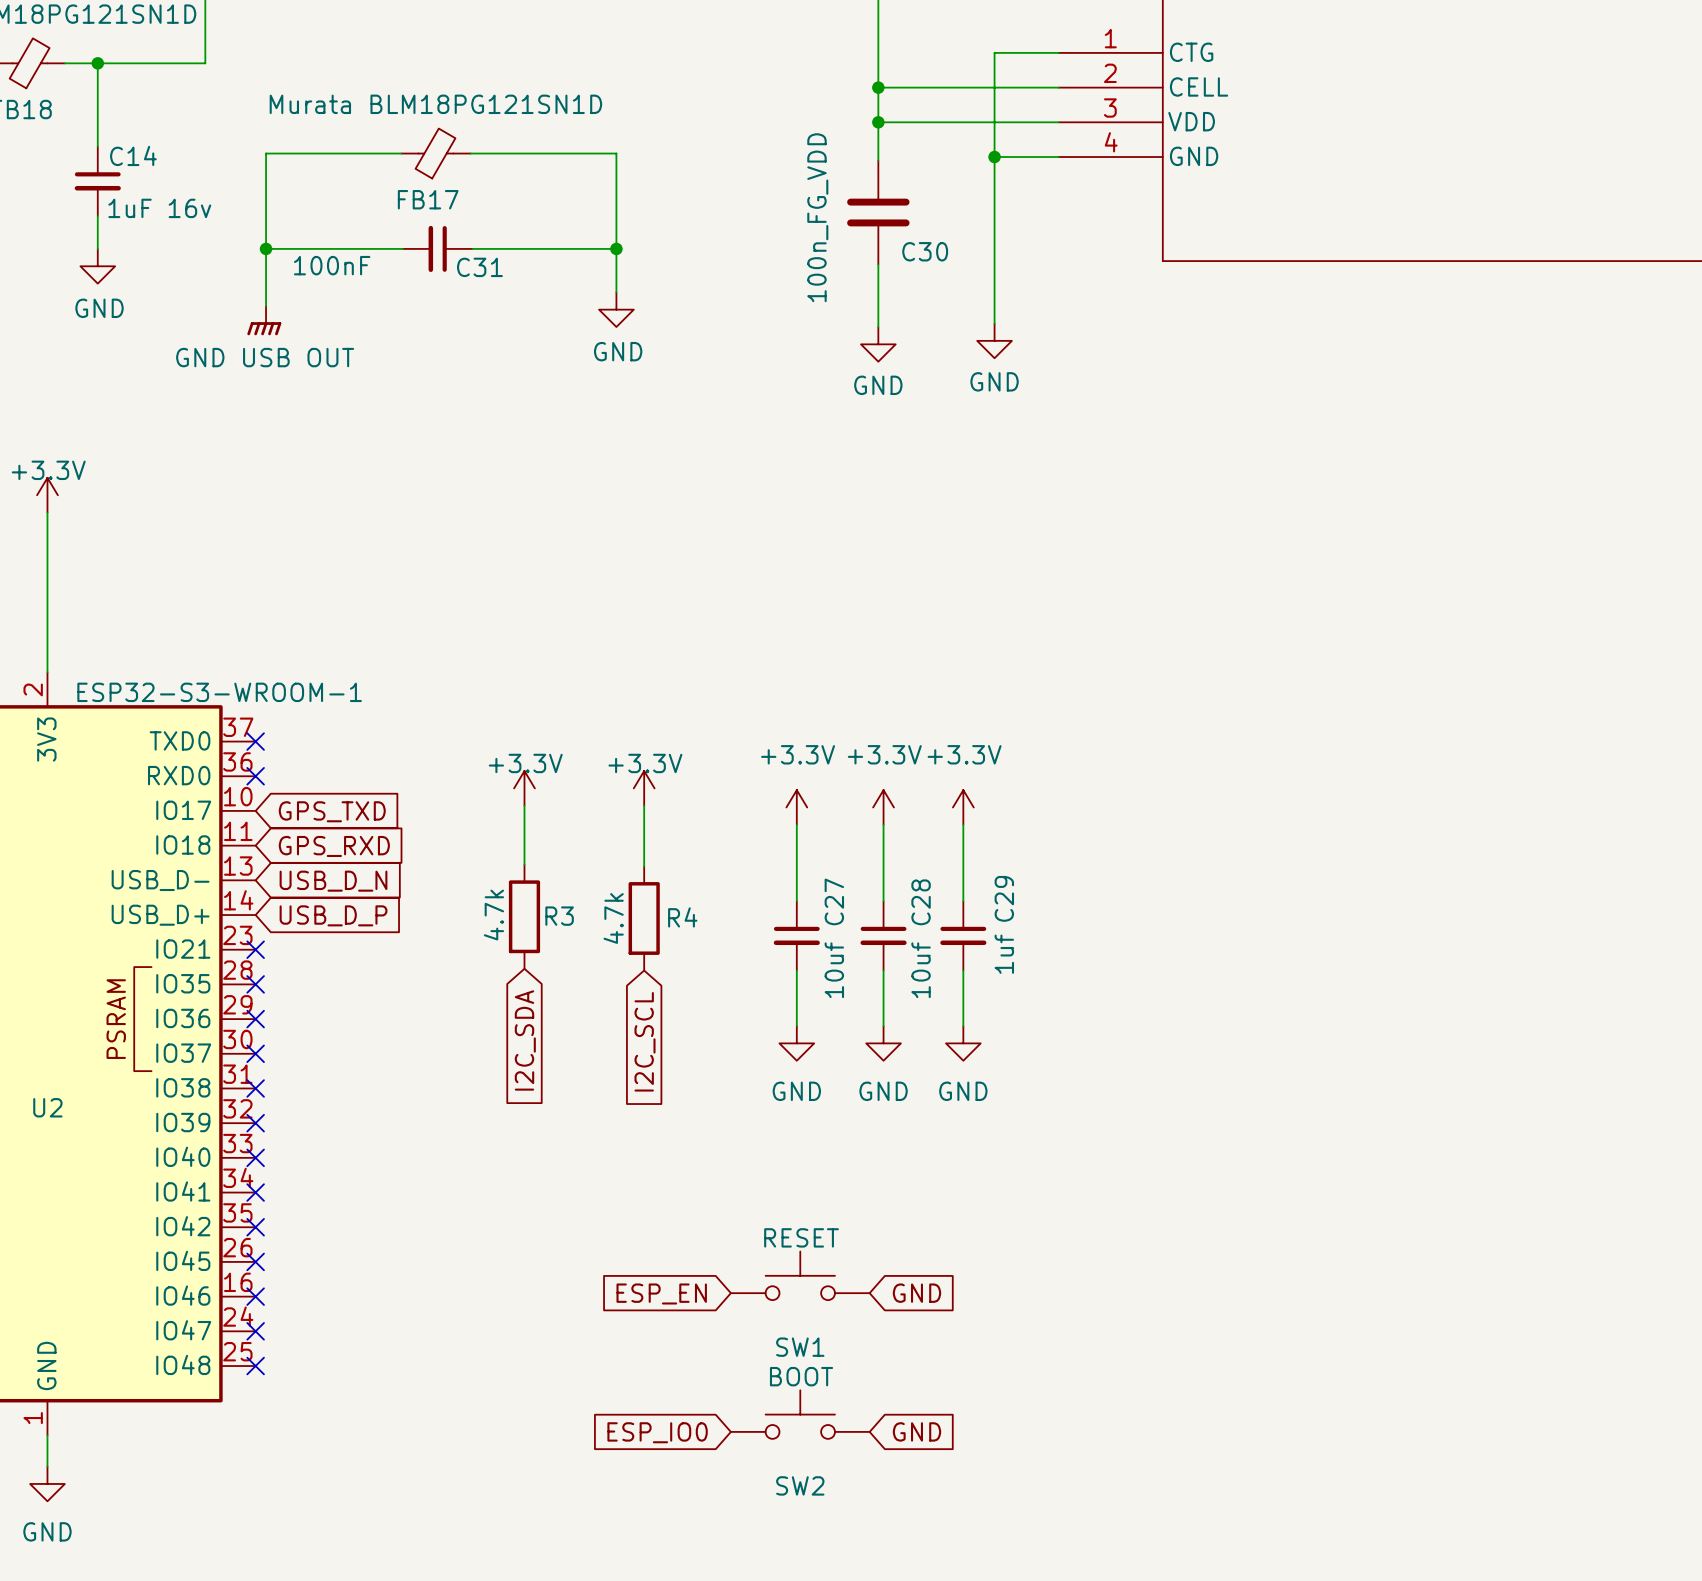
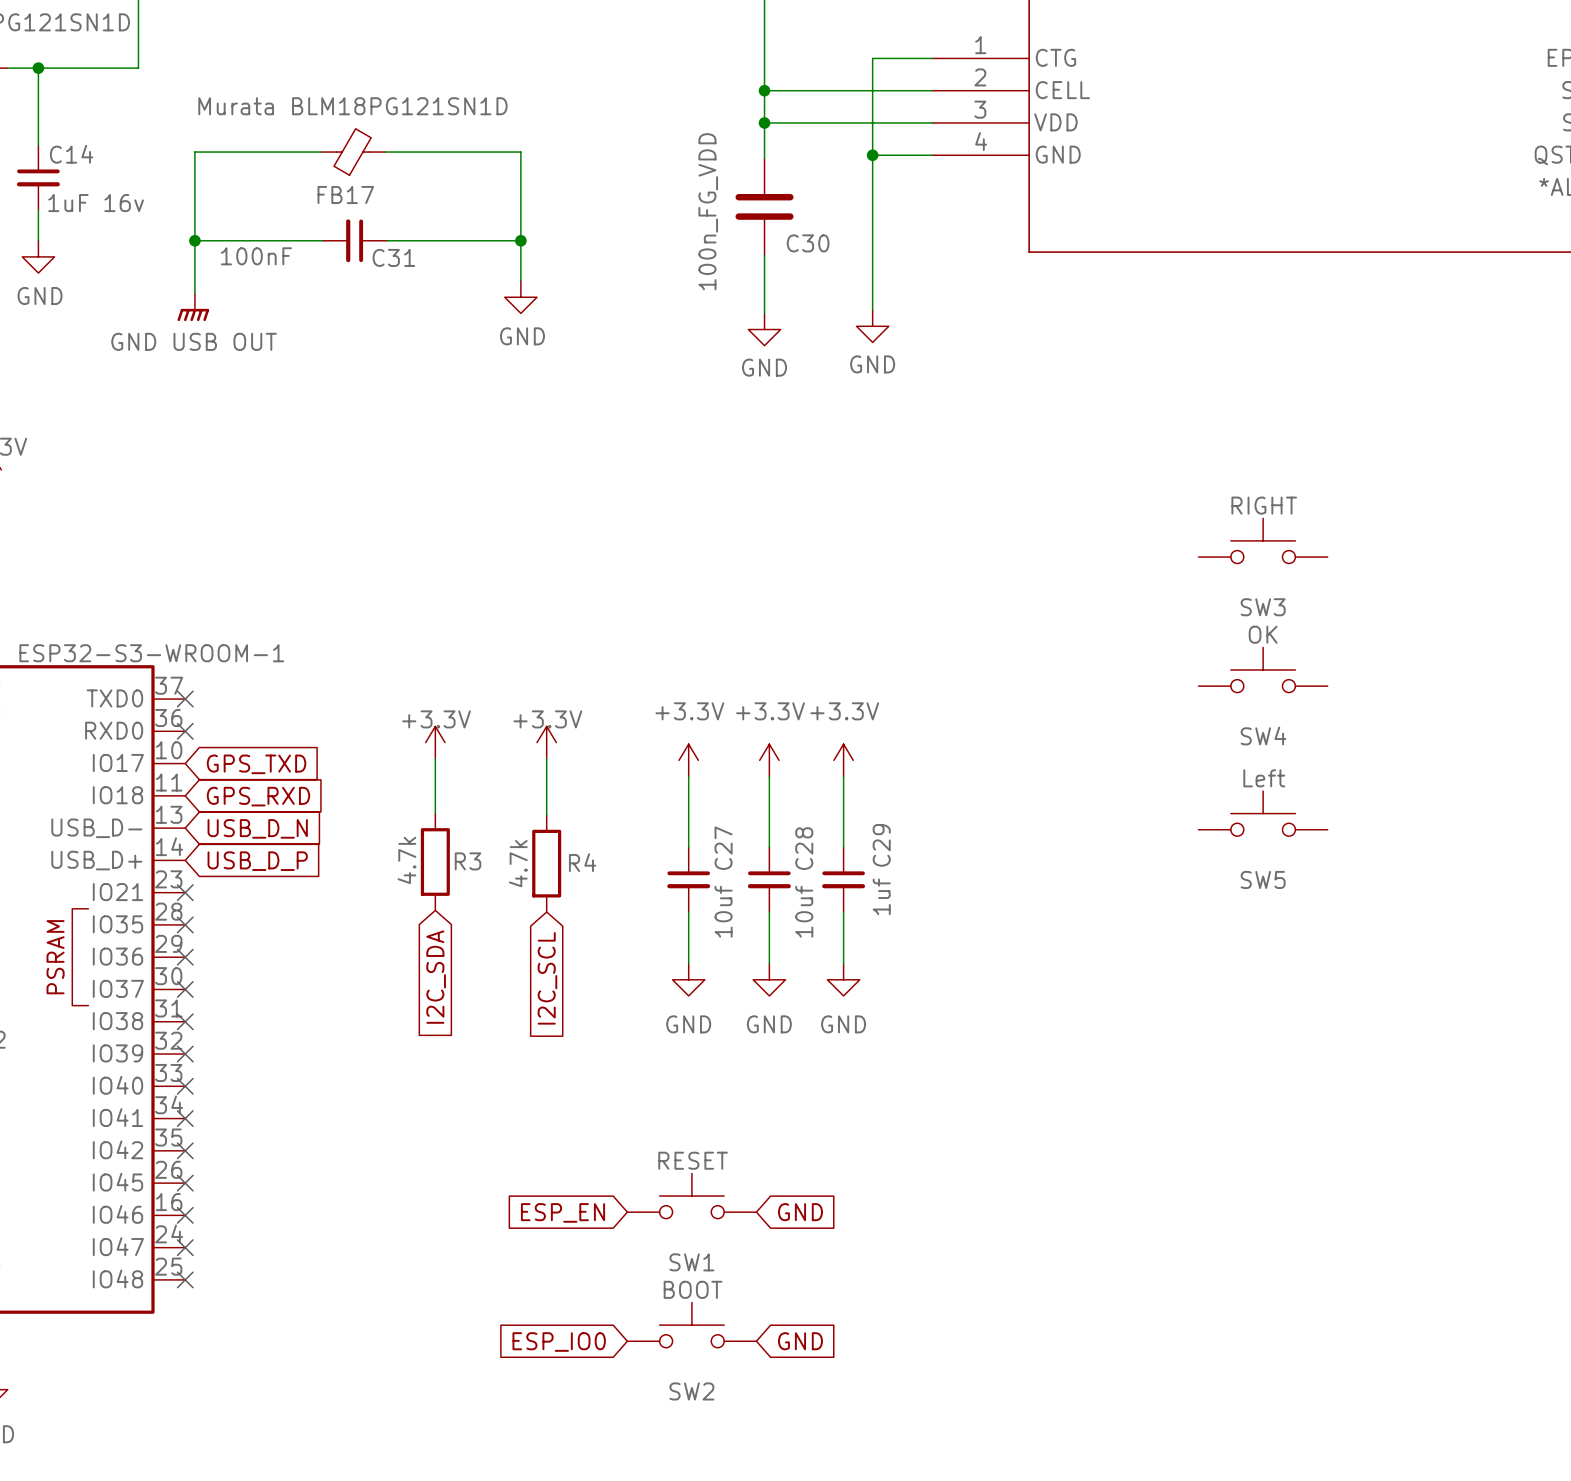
SW3: none -> RIGHT (1263, 540)
SW4: none -> OK (1263, 669)
SW5: none -> Left (1263, 813)

